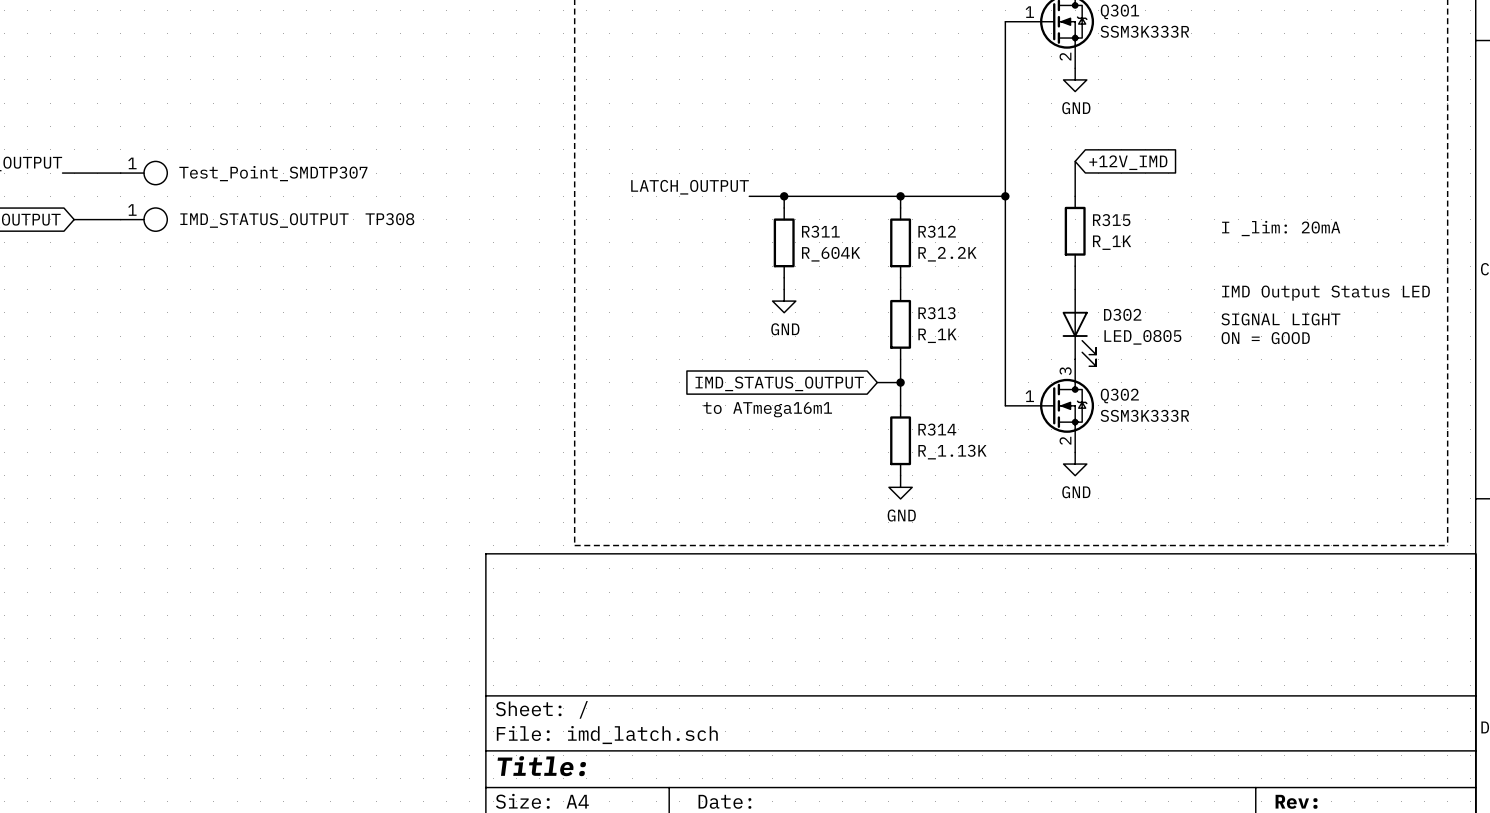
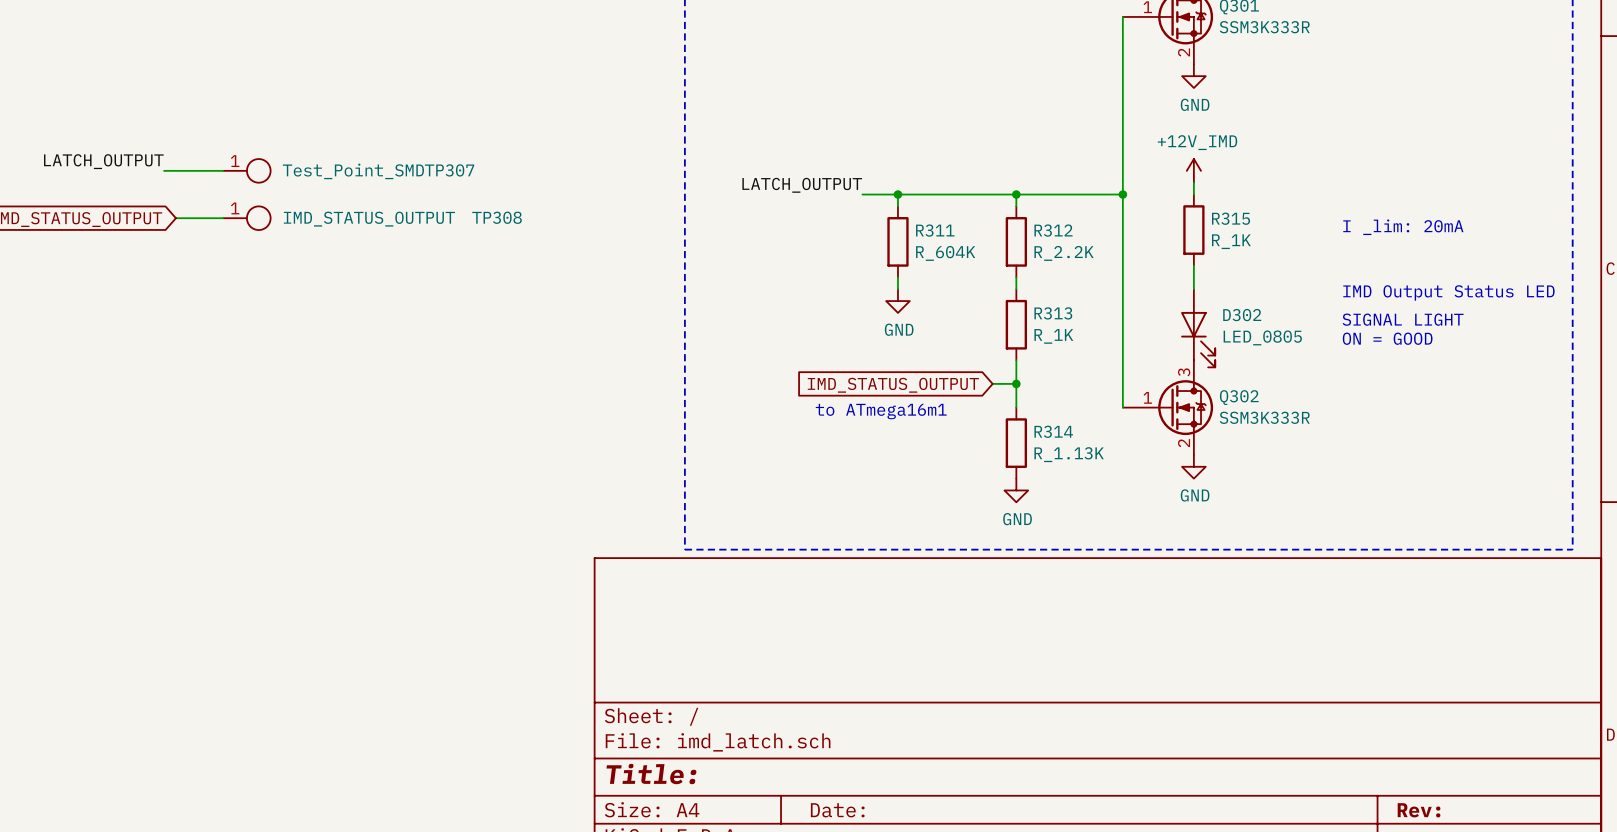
global label: +12V_IMD (1128, 162) -> none
power symbol: none -> +12V_IMD (1193, 170)

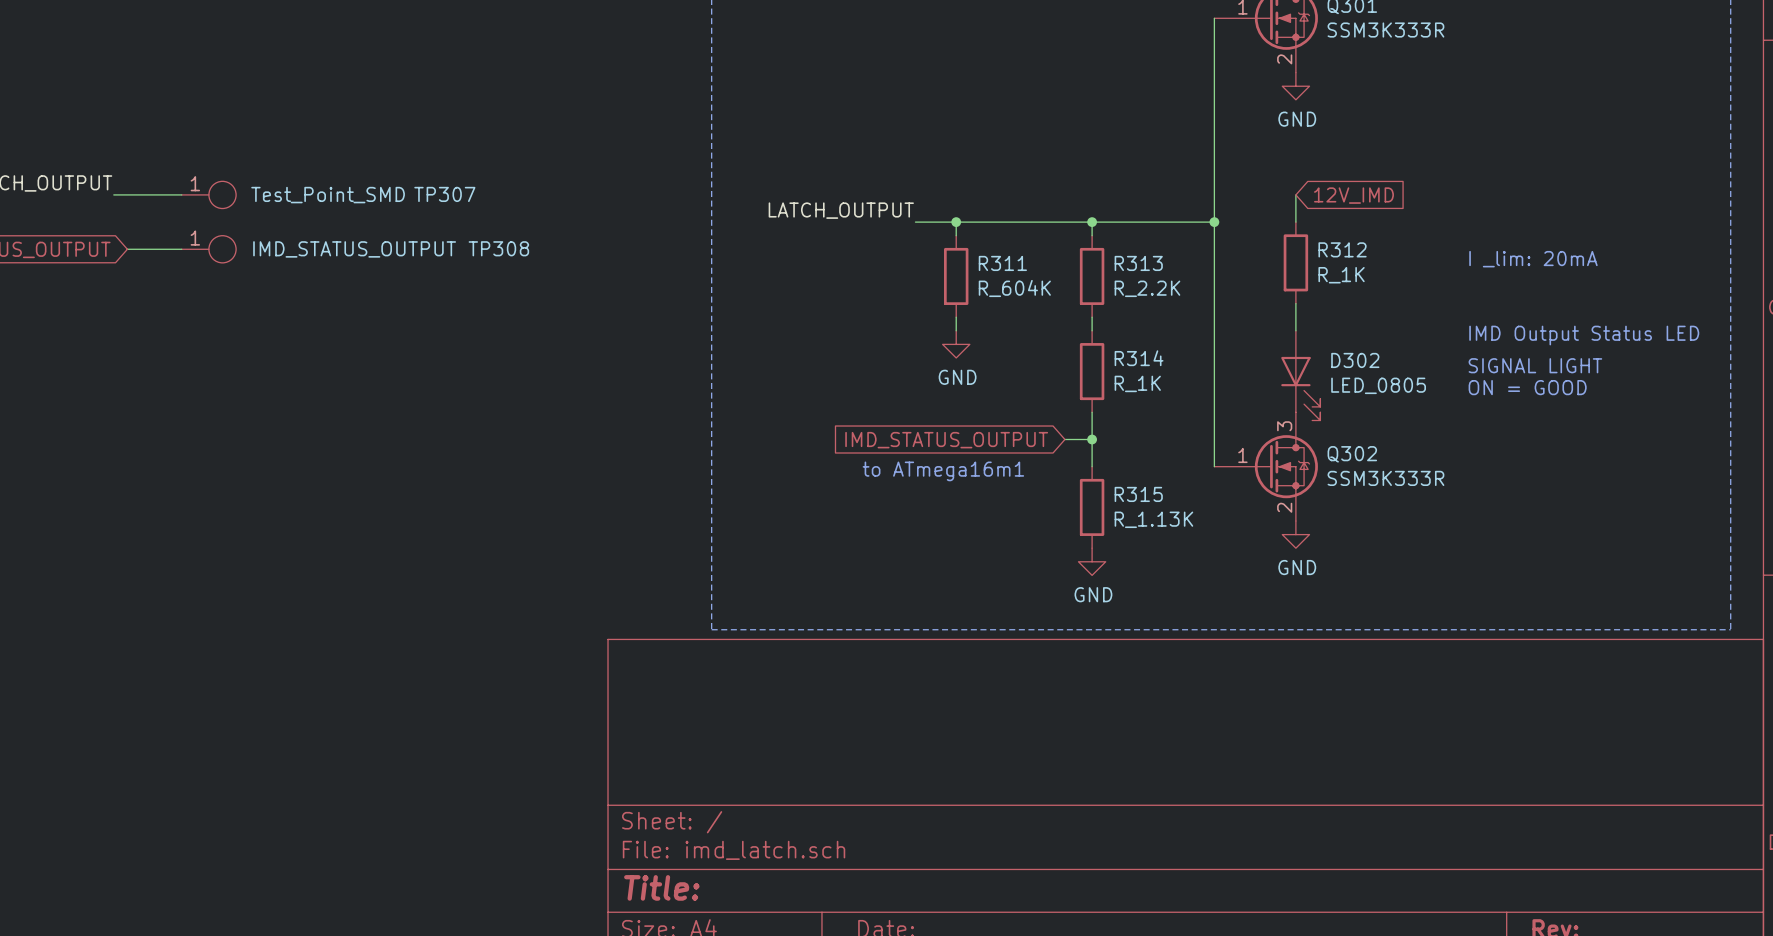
power symbol: +12V_IMD (1193, 170) -> none
global label: none -> 12V_IMD (1353, 195)
R315 name: R315 (1231, 218) -> R312 (1342, 249)
R312 name: R312 (1053, 230) -> R313 (1138, 263)
R313 name: R313 (1053, 313) -> R314 (1139, 358)
R314 name: R314 (1053, 431) -> R315 (1138, 494)

